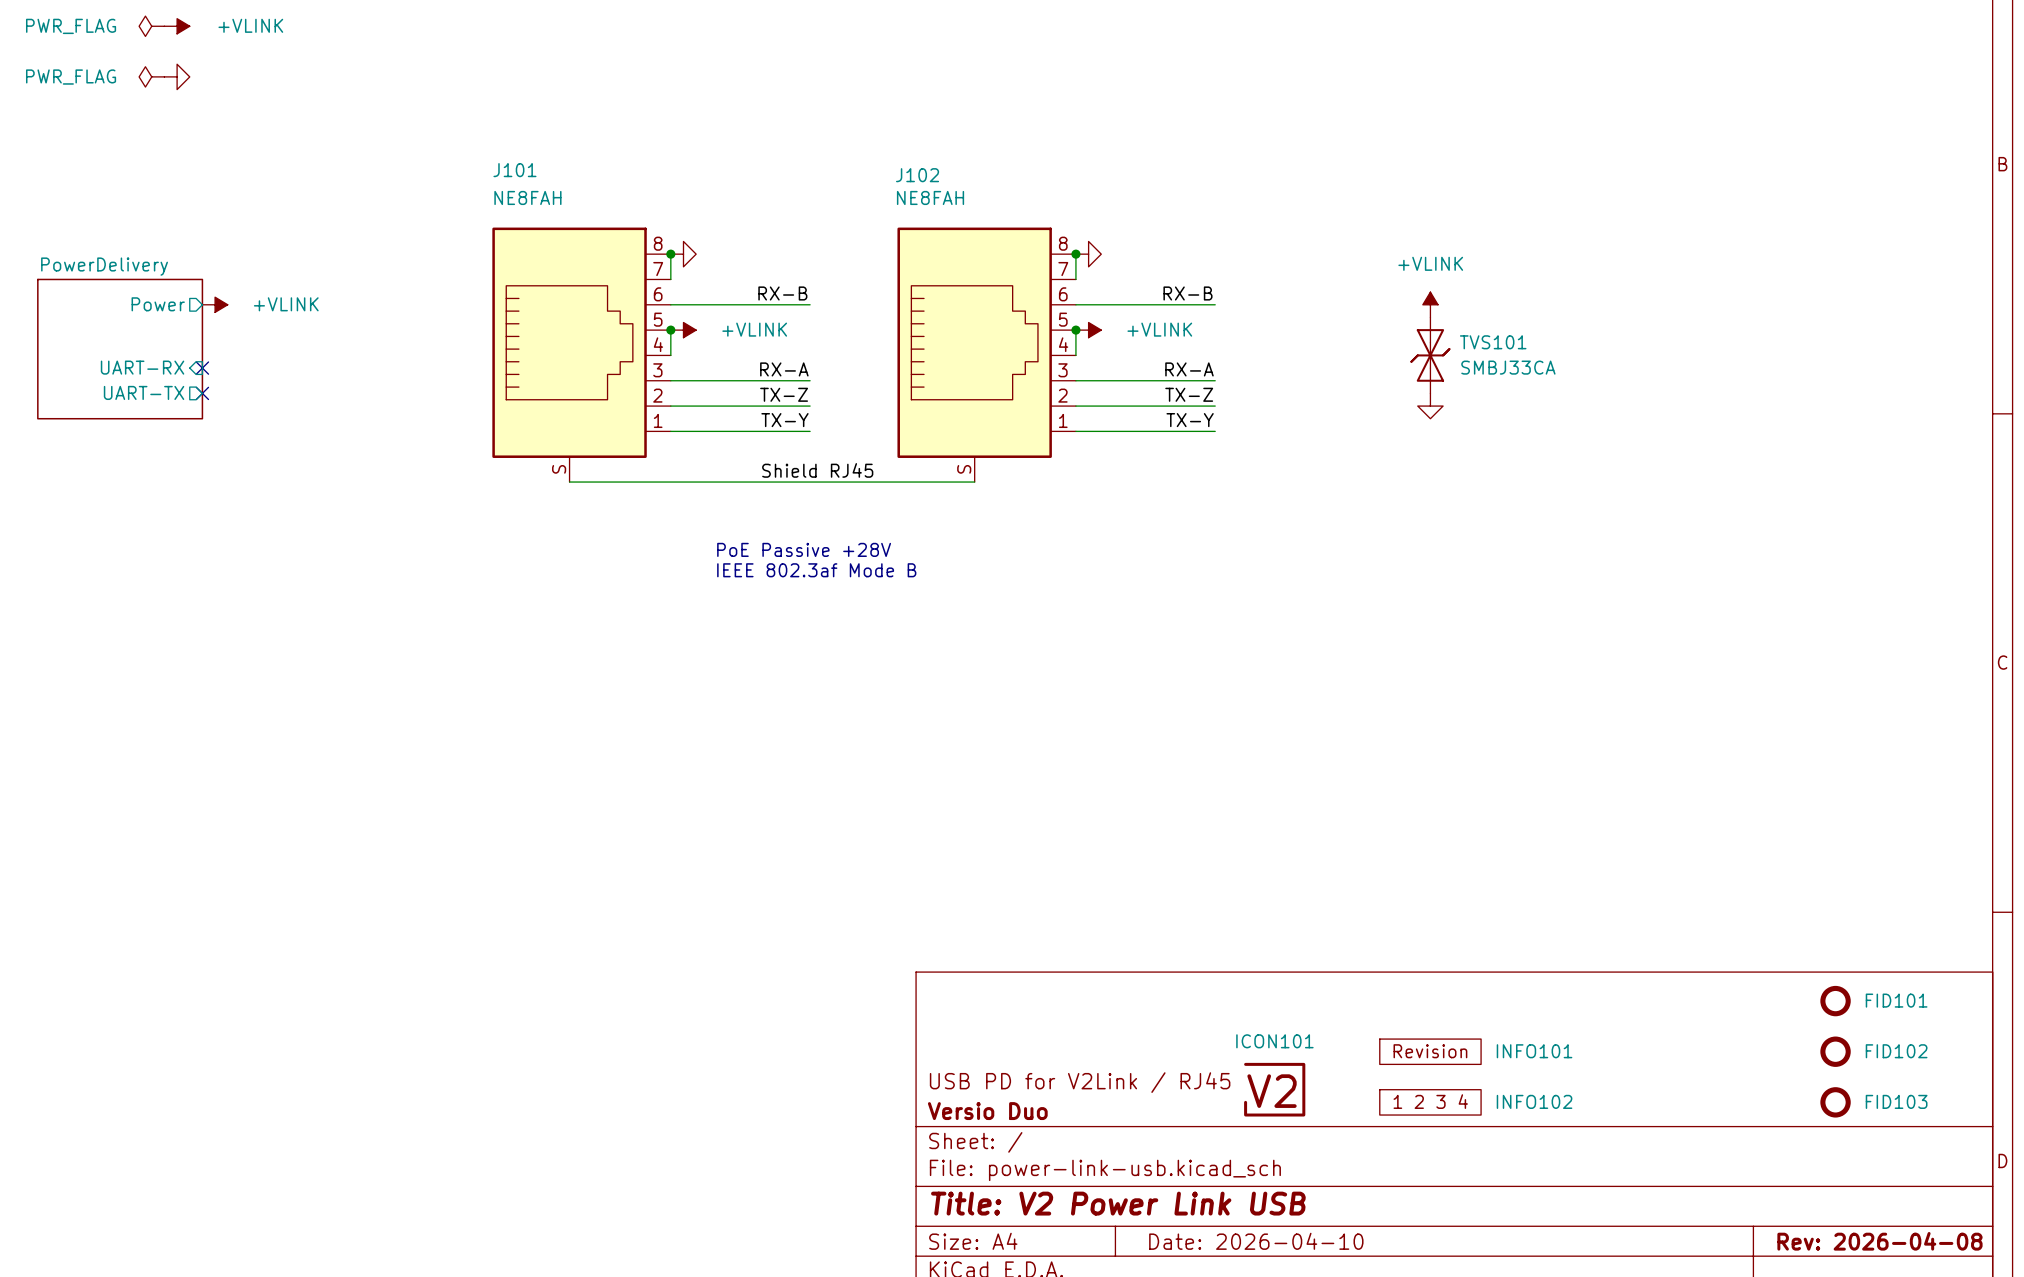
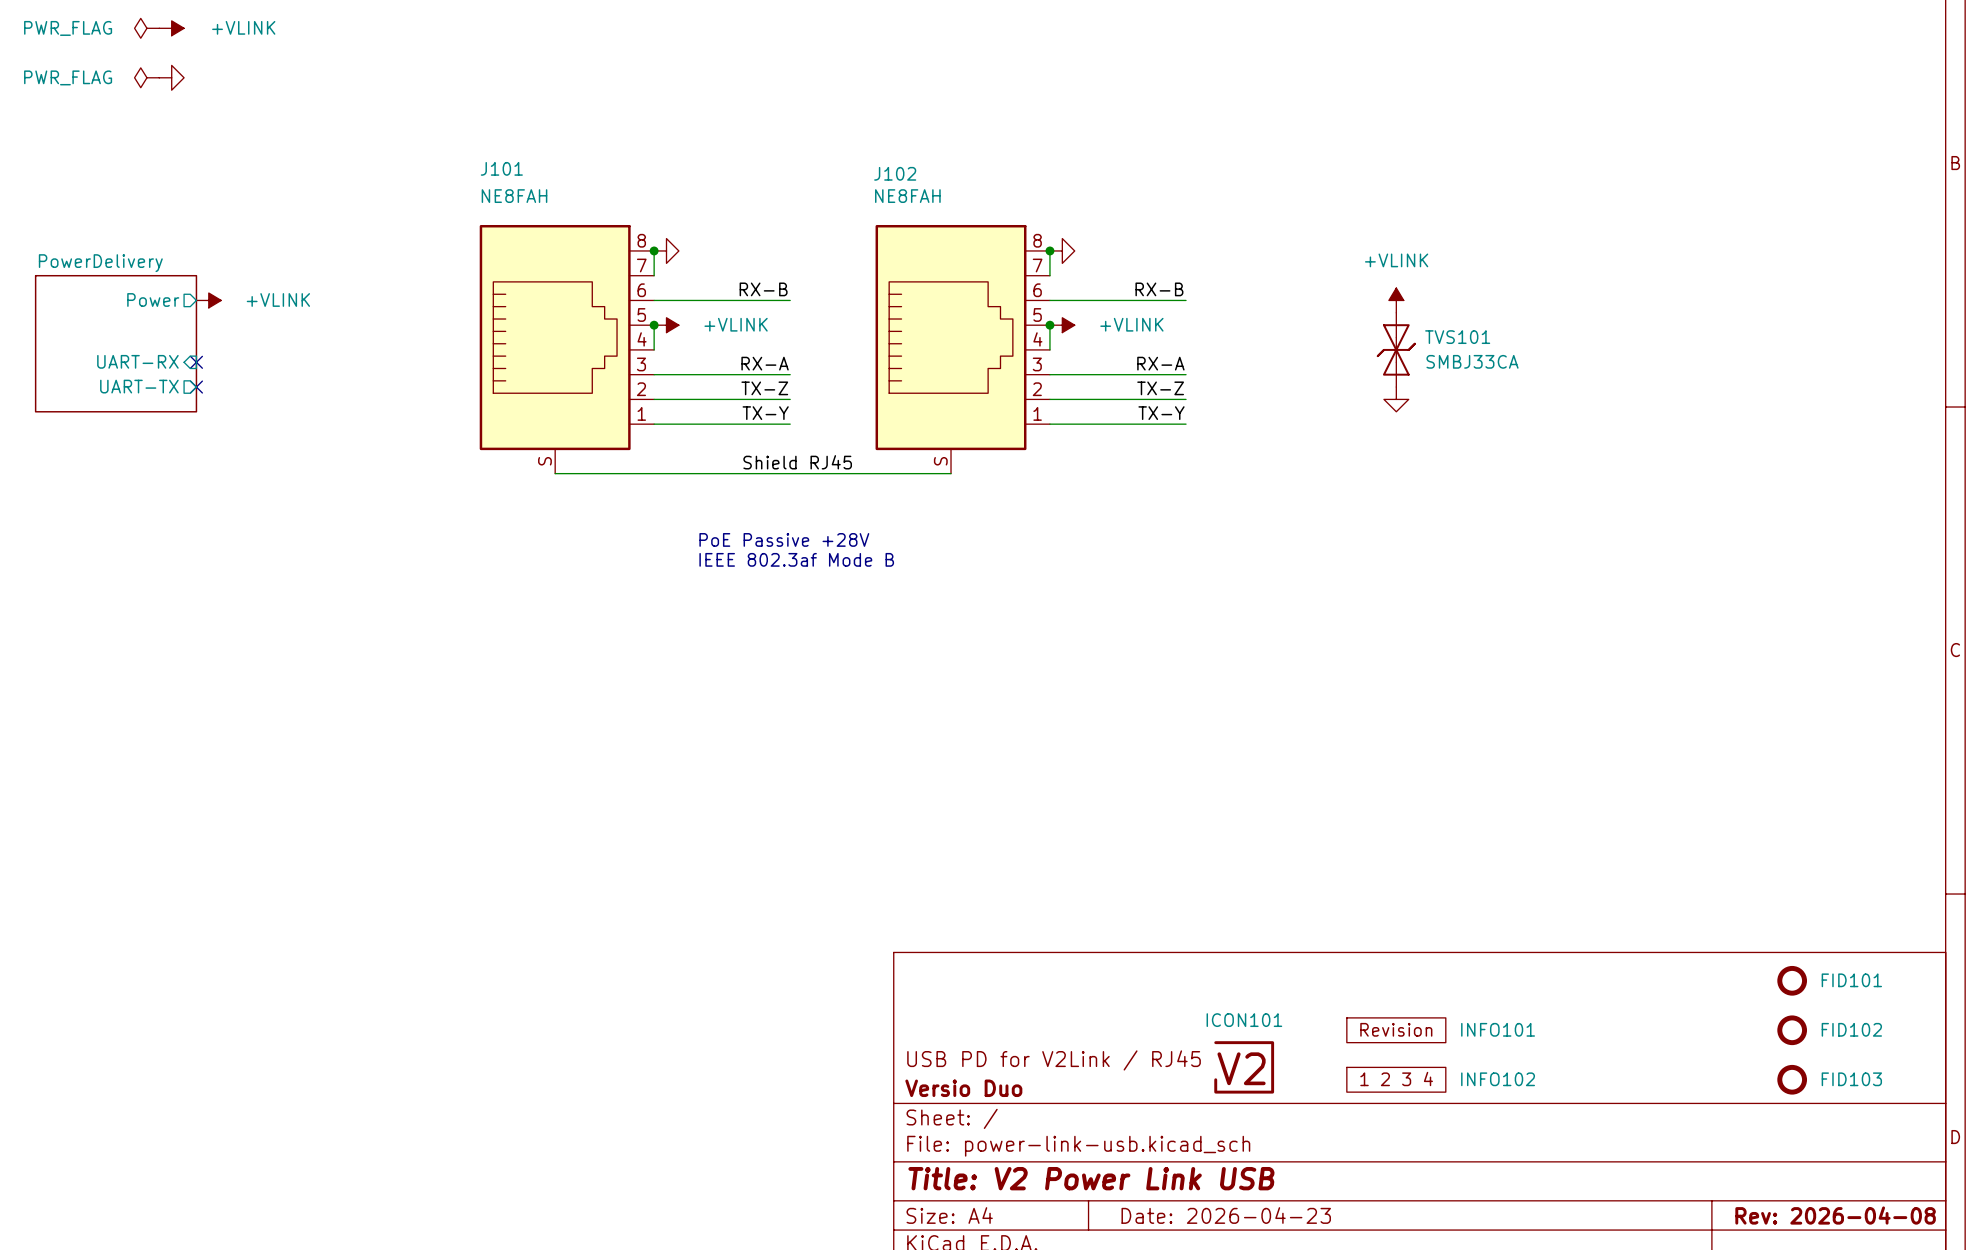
title block: Date: 2026-04-10 (1256, 1241) -> Date: 2026-04-23 (1226, 1215)

